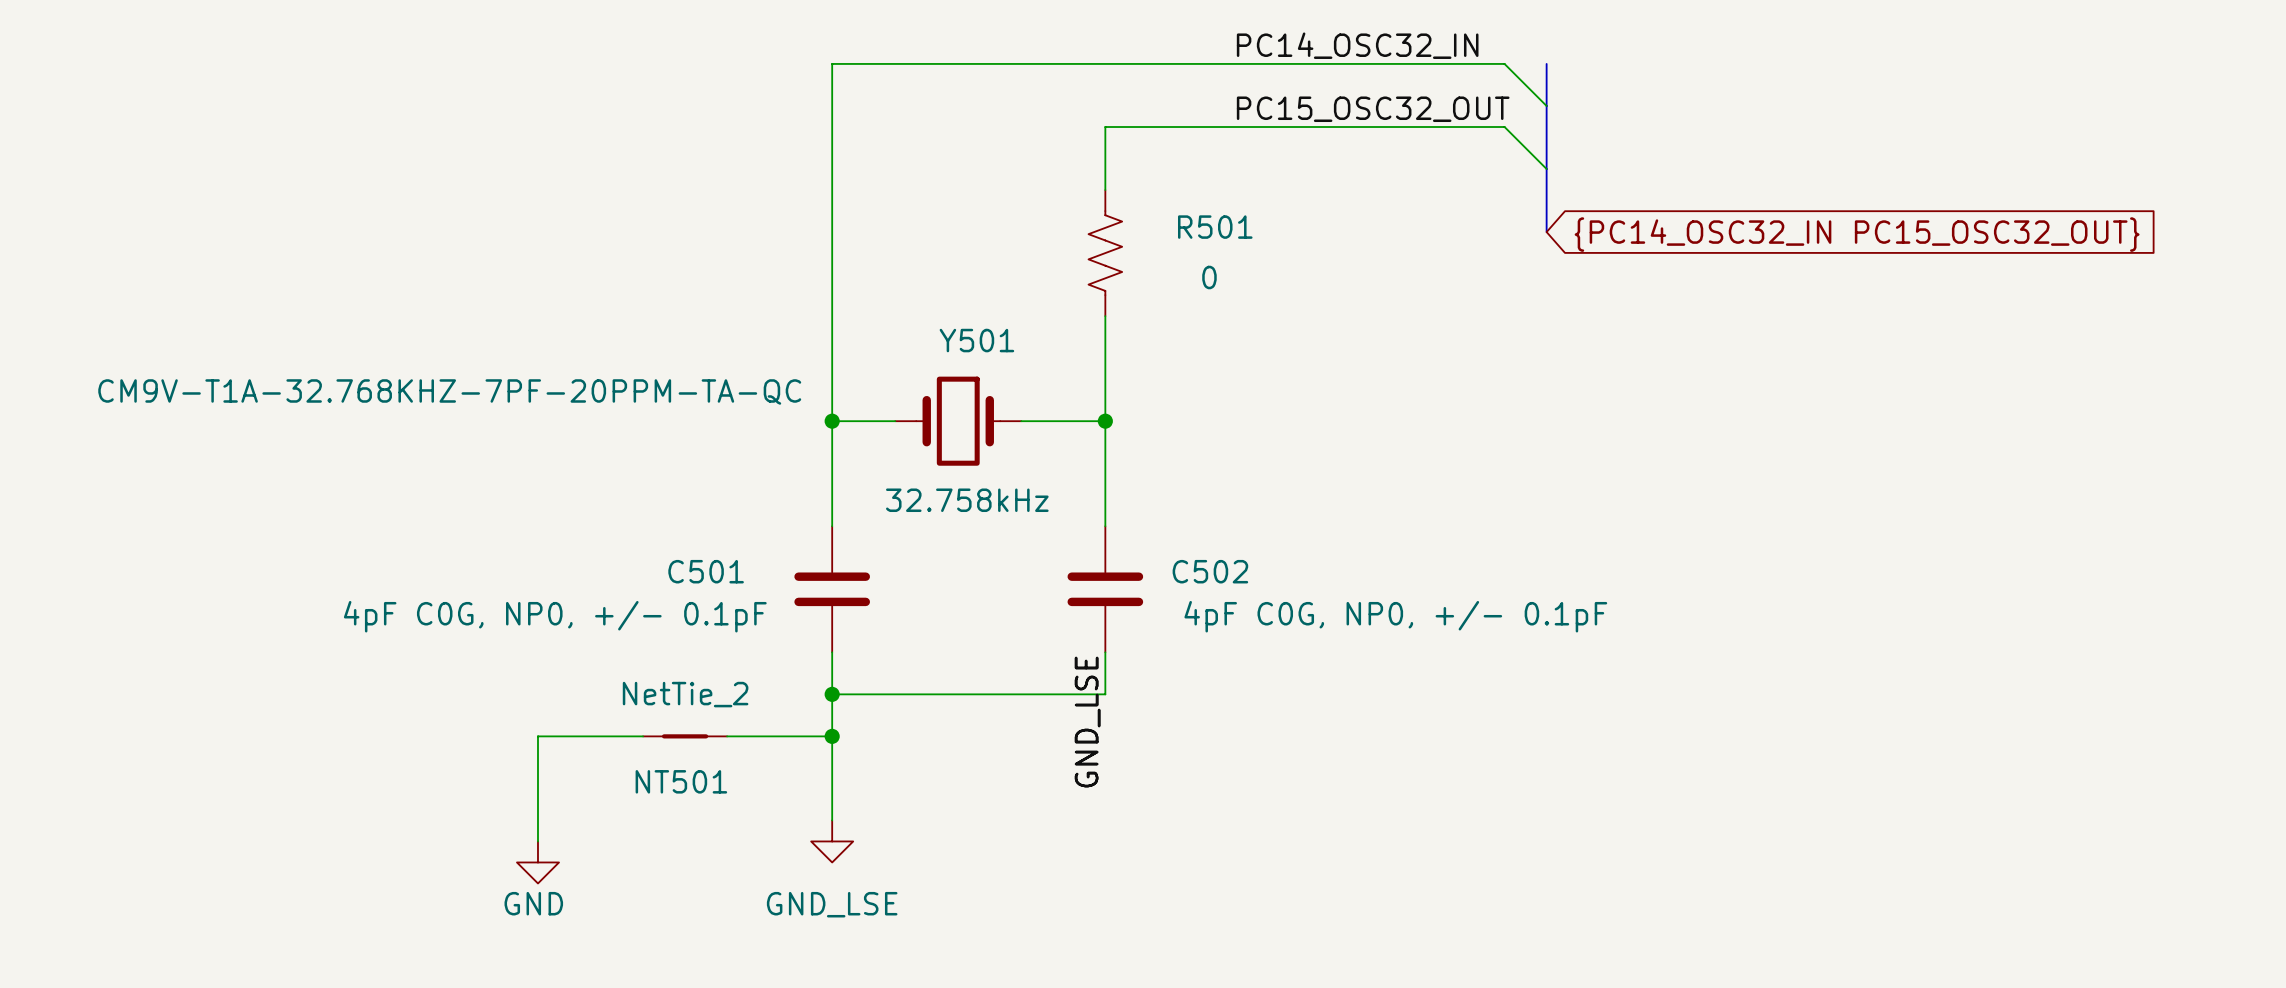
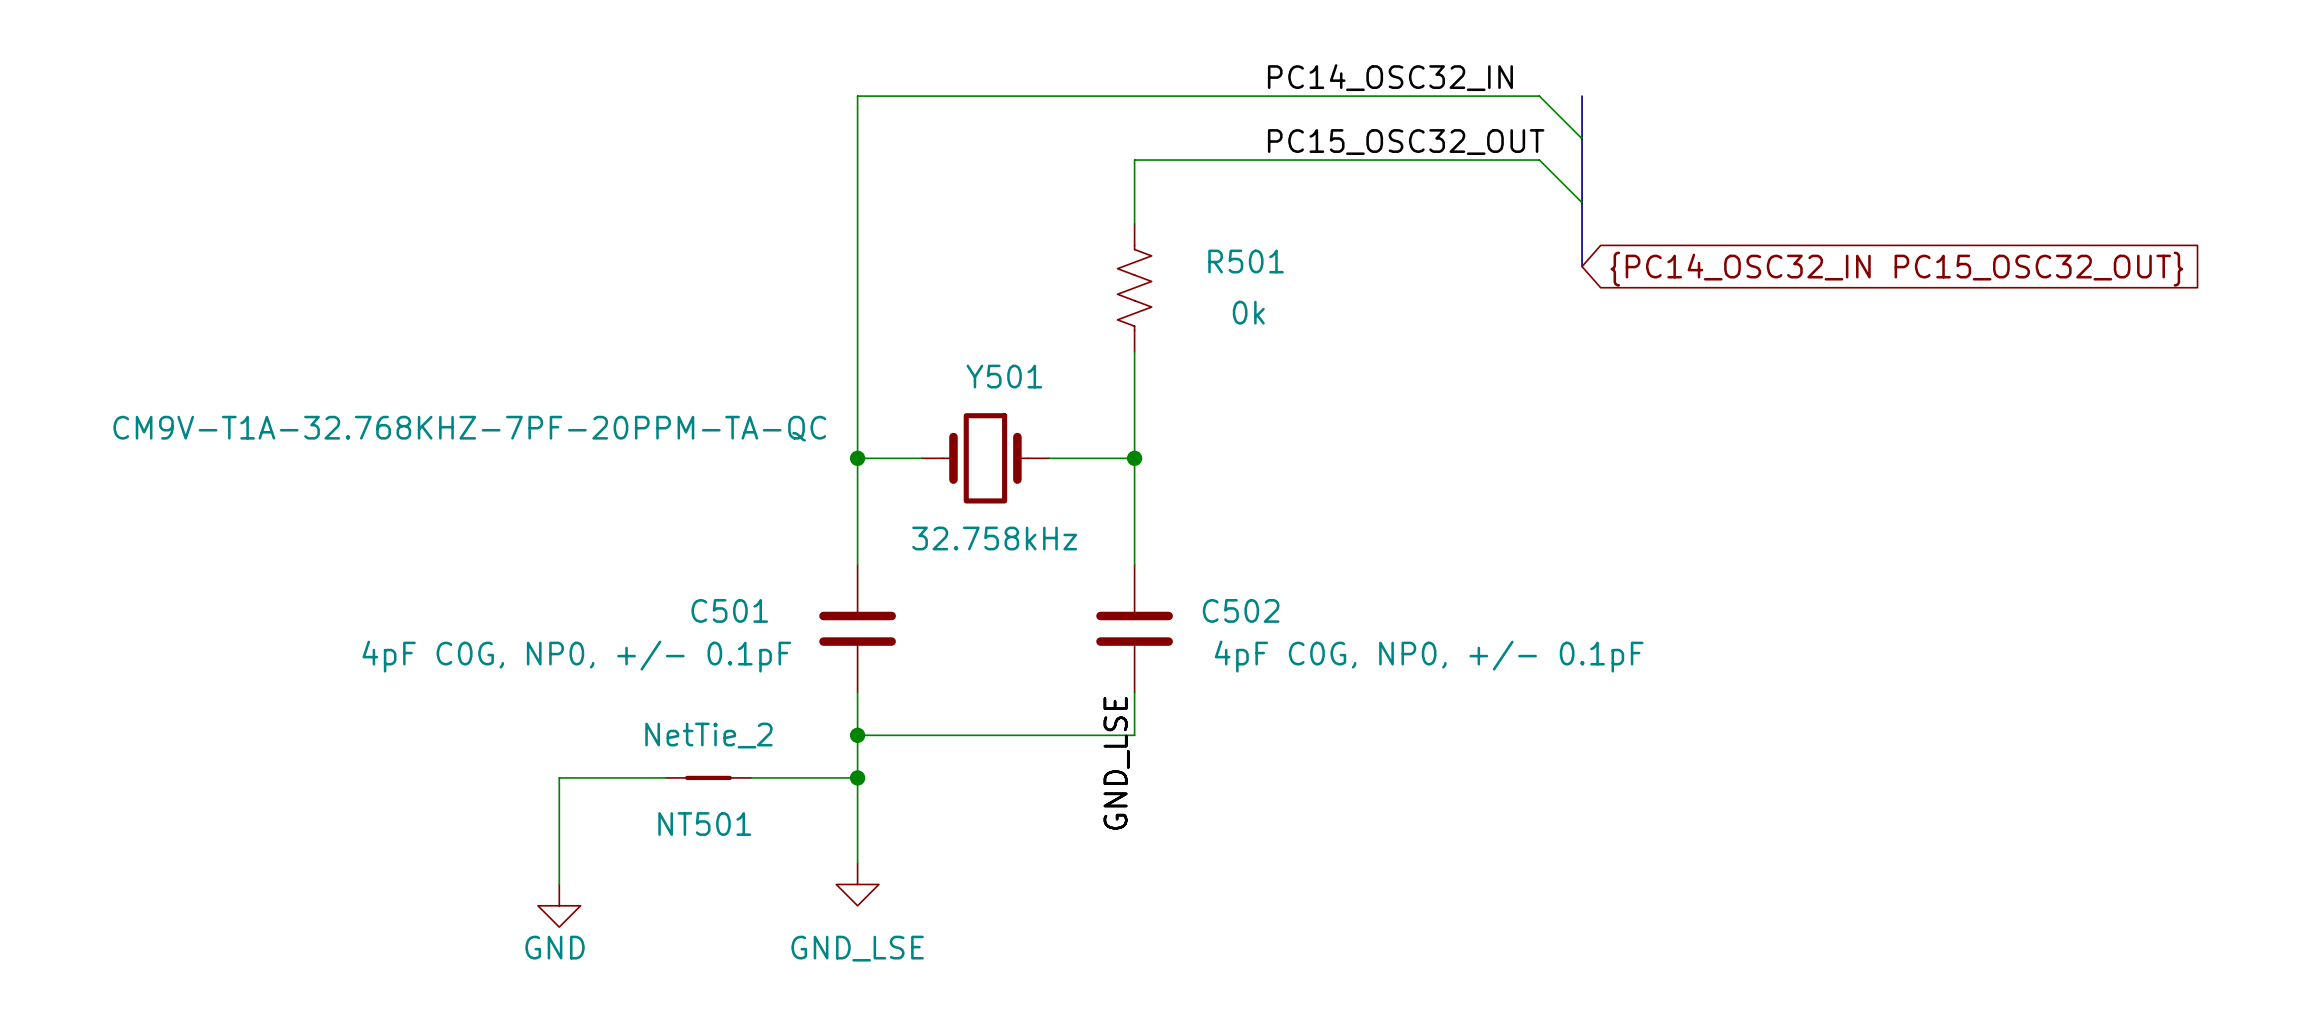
R501 value: 0 (1209, 277) -> 0k (1248, 312)

